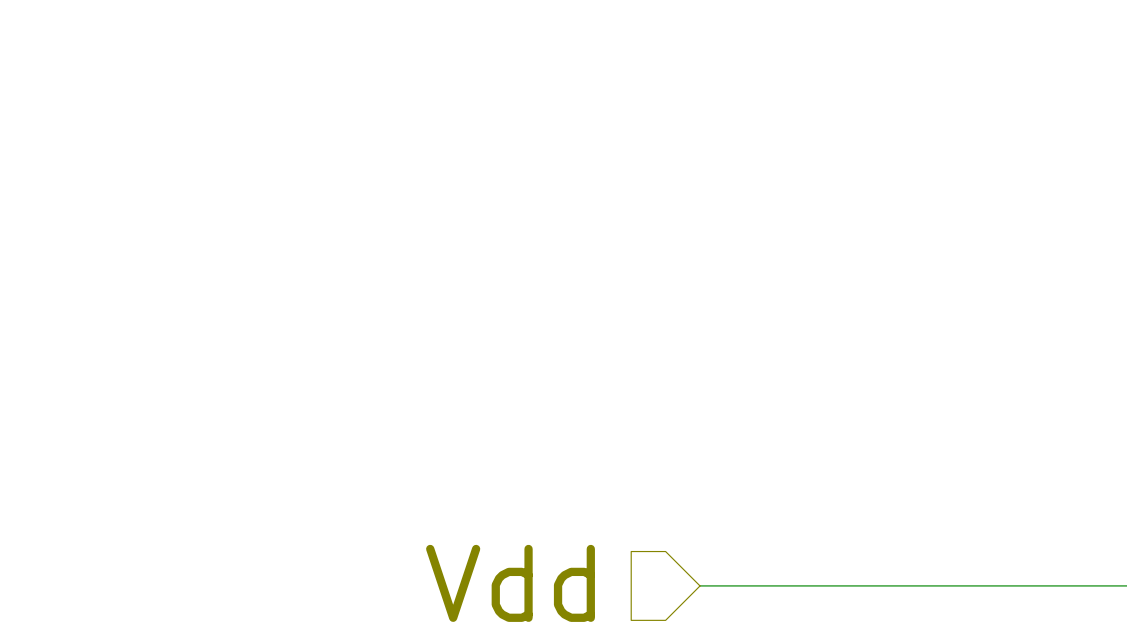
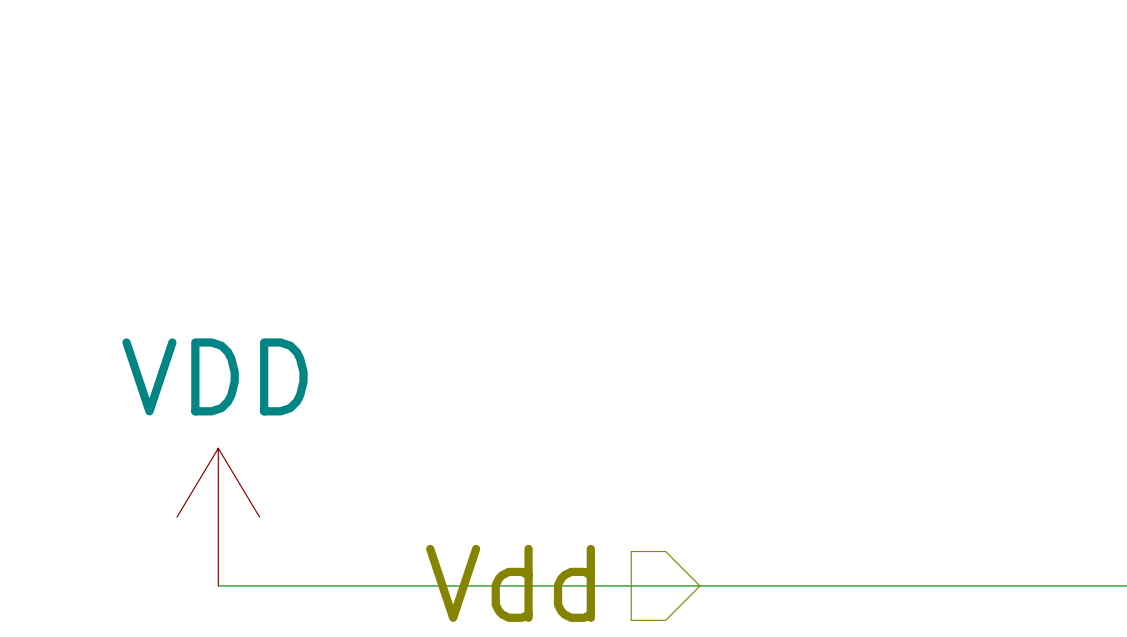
power symbol: none -> VDD (218, 517)
wire: none -> (218, 585) (700, 585)

